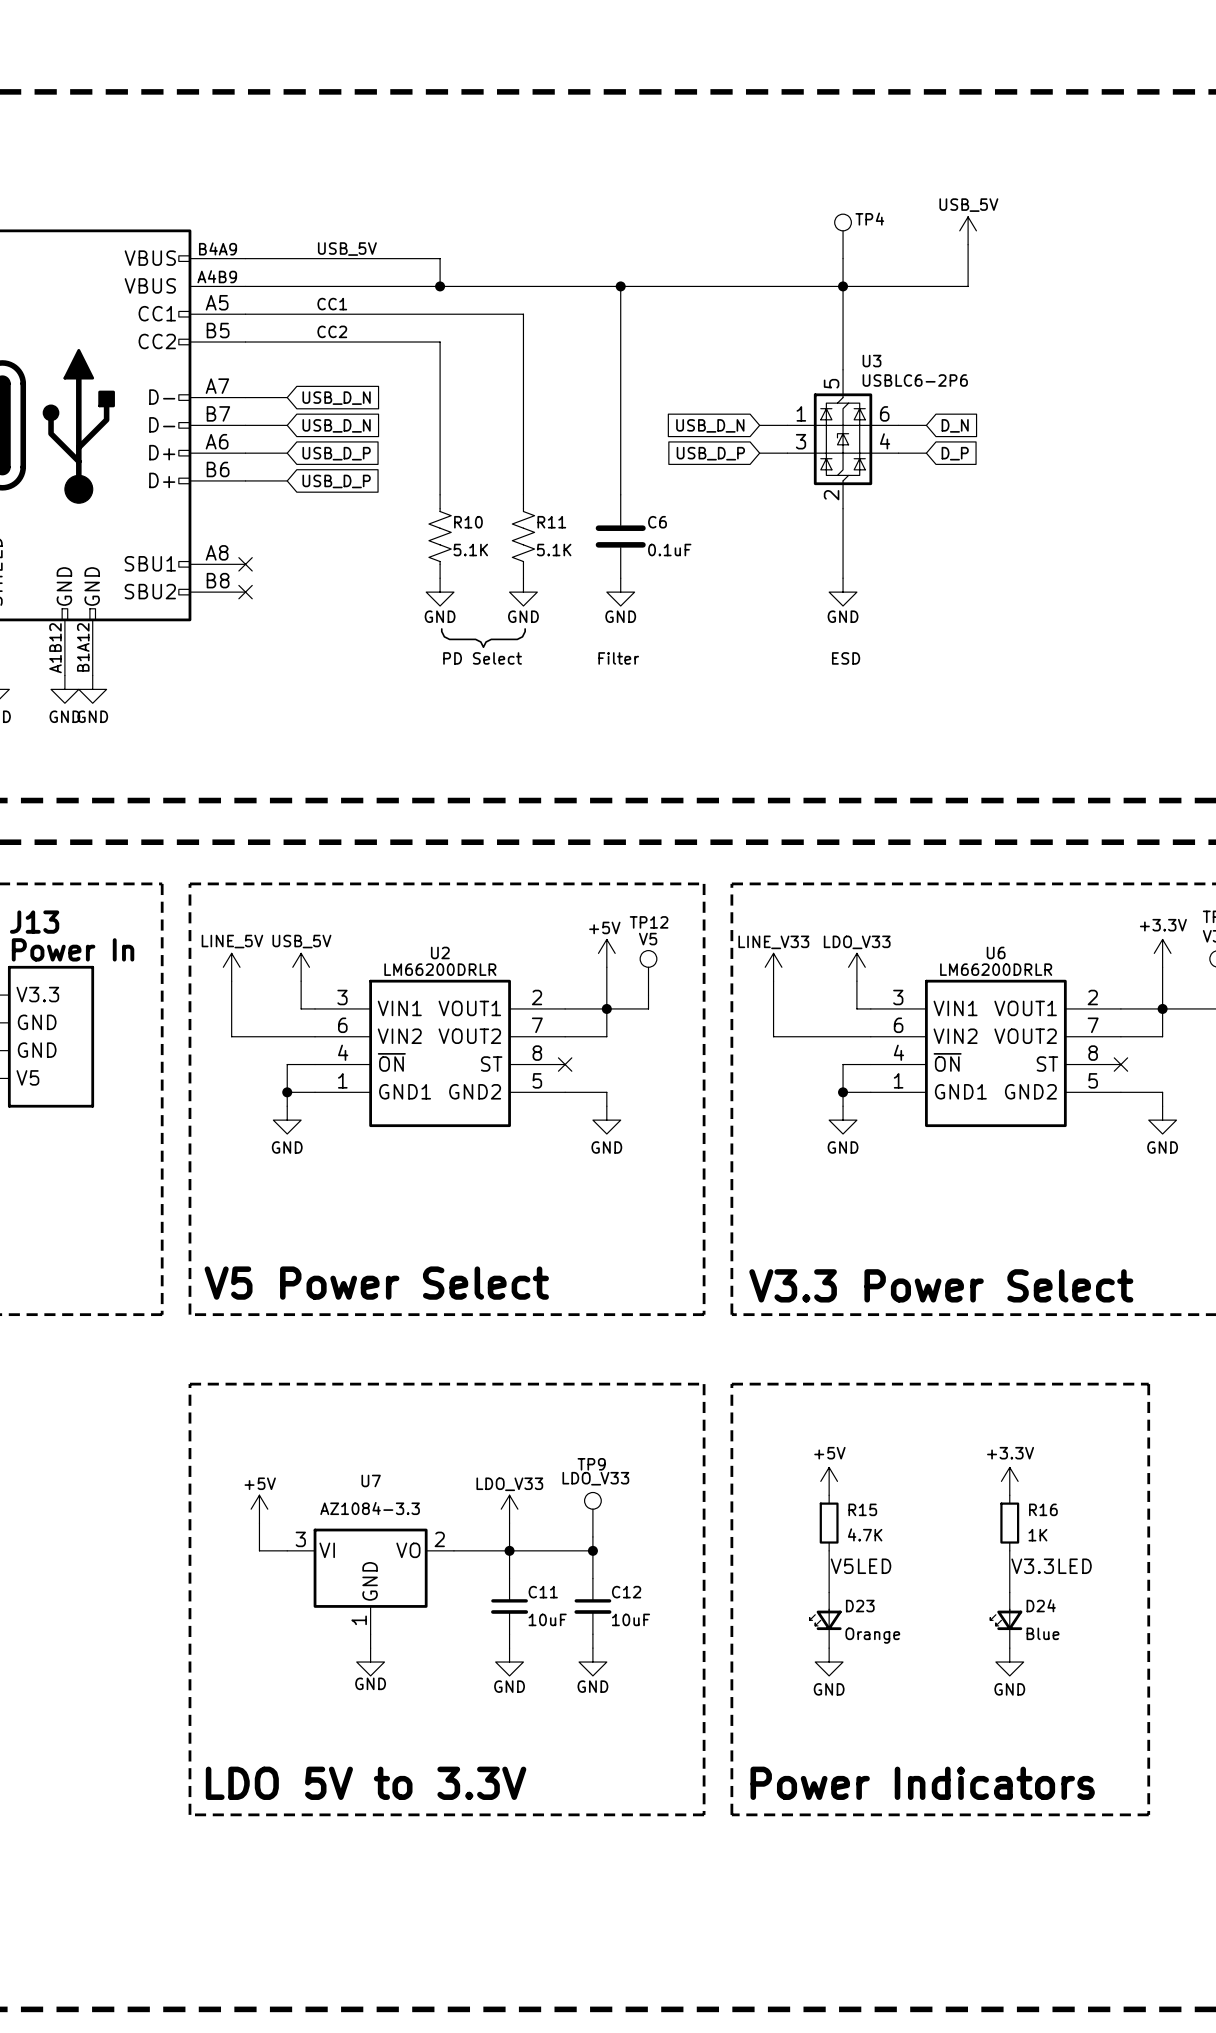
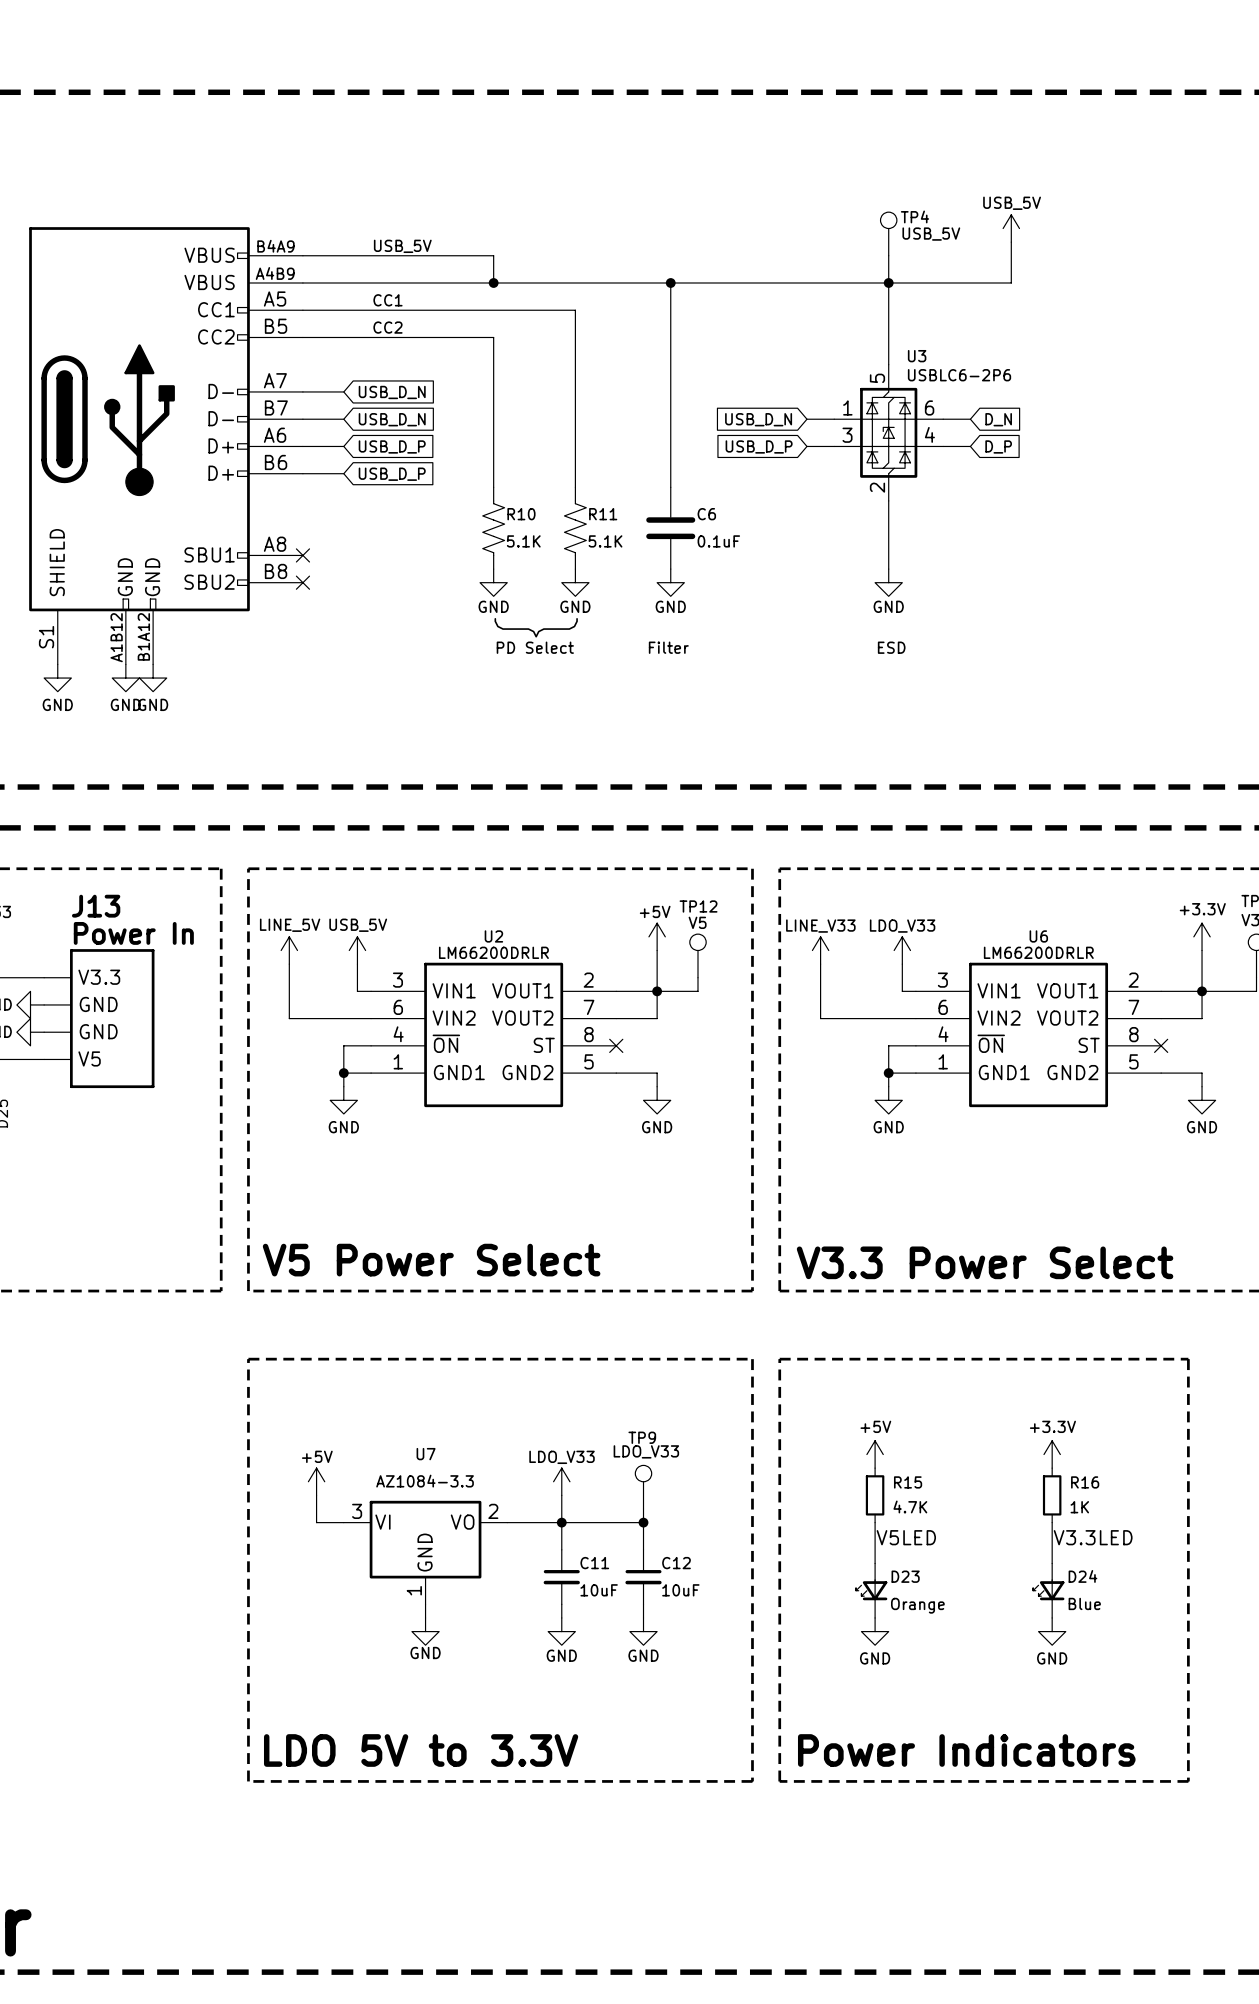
TP4 value: none -> USB_5V (931, 234)

